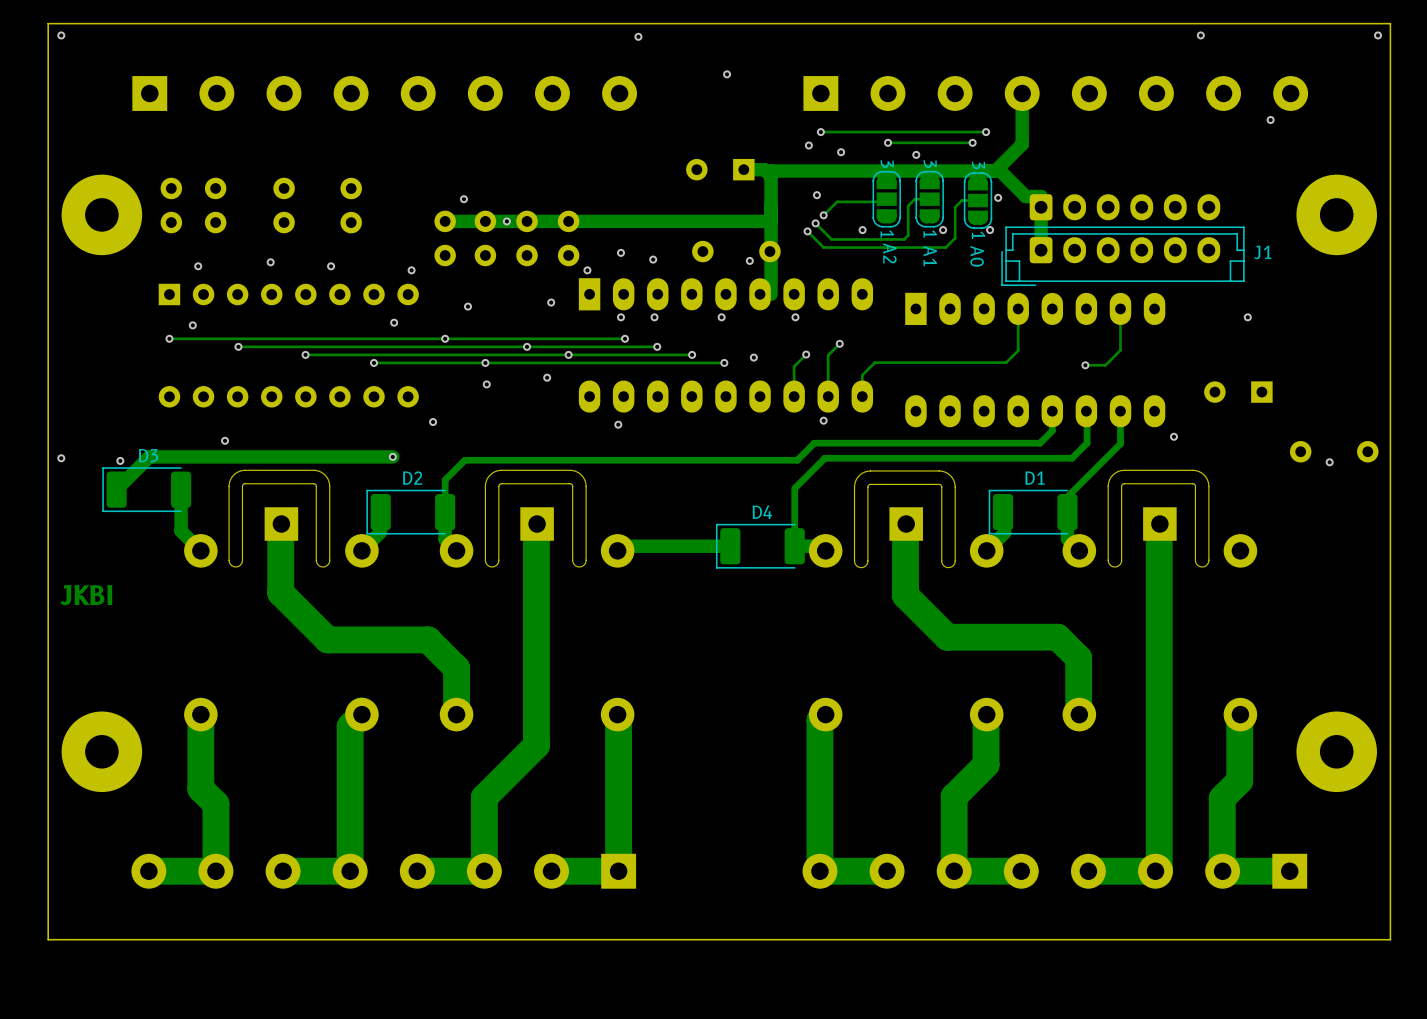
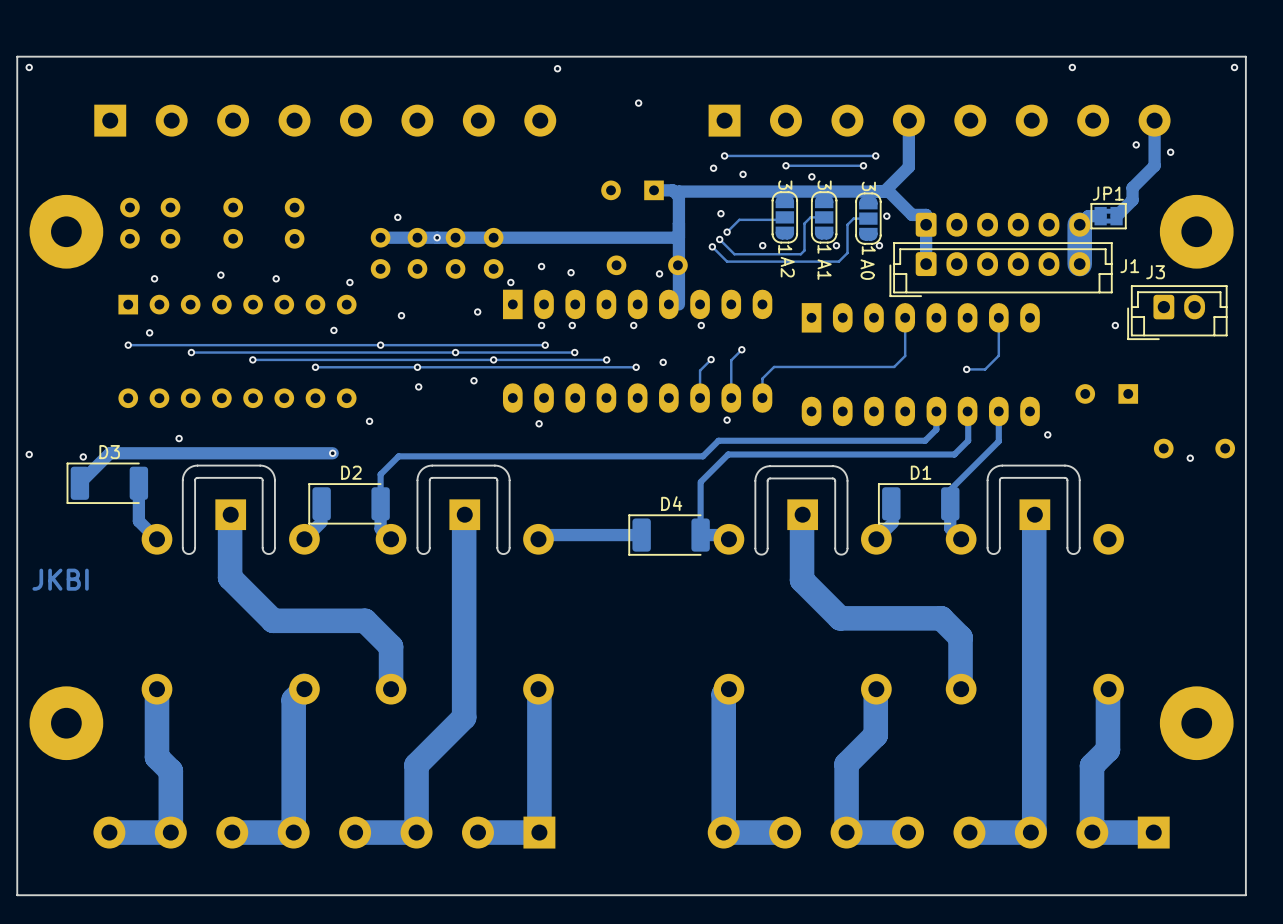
track: none -> (1154, 120) (1154, 165) (1132, 187) (1132, 200) (1116, 216)
via: none -> (1170, 152)
track: none -> (1100, 216) (1088, 216) (1079, 224) (1079, 264)
JP1: none -> (1108, 216)
J3: none -> (1177, 312)

